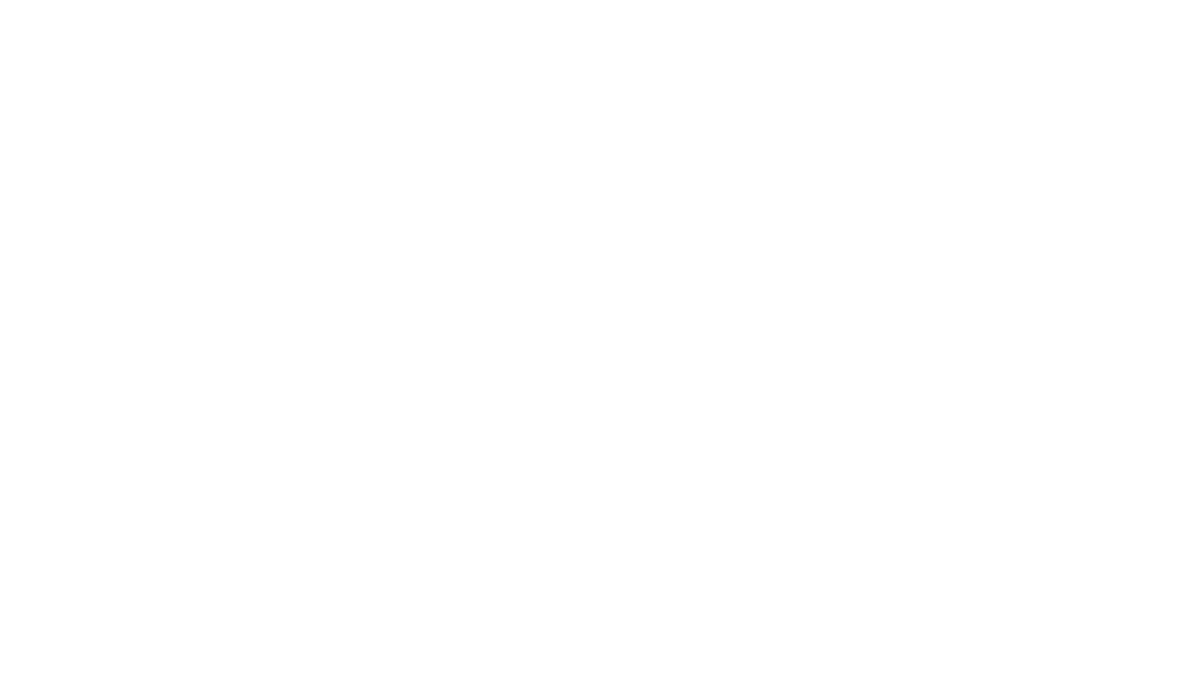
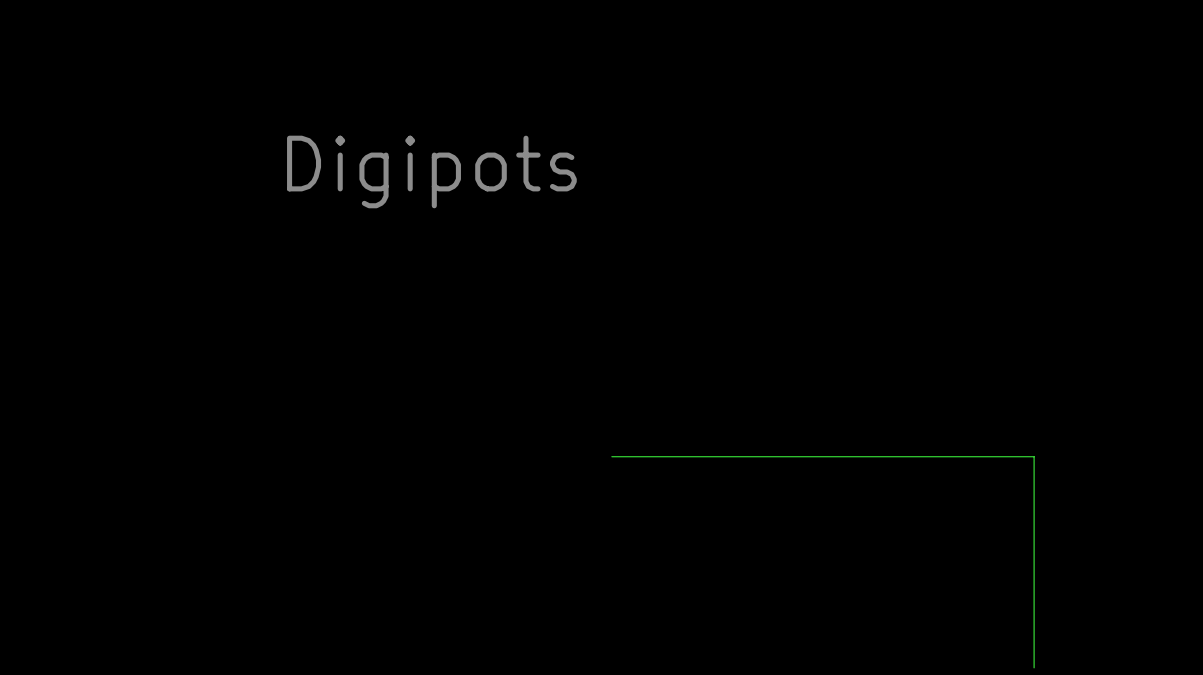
text: none -> Digipots (431, 171)
wire: none -> (611, 456) (1034, 456) (1034, 667)

